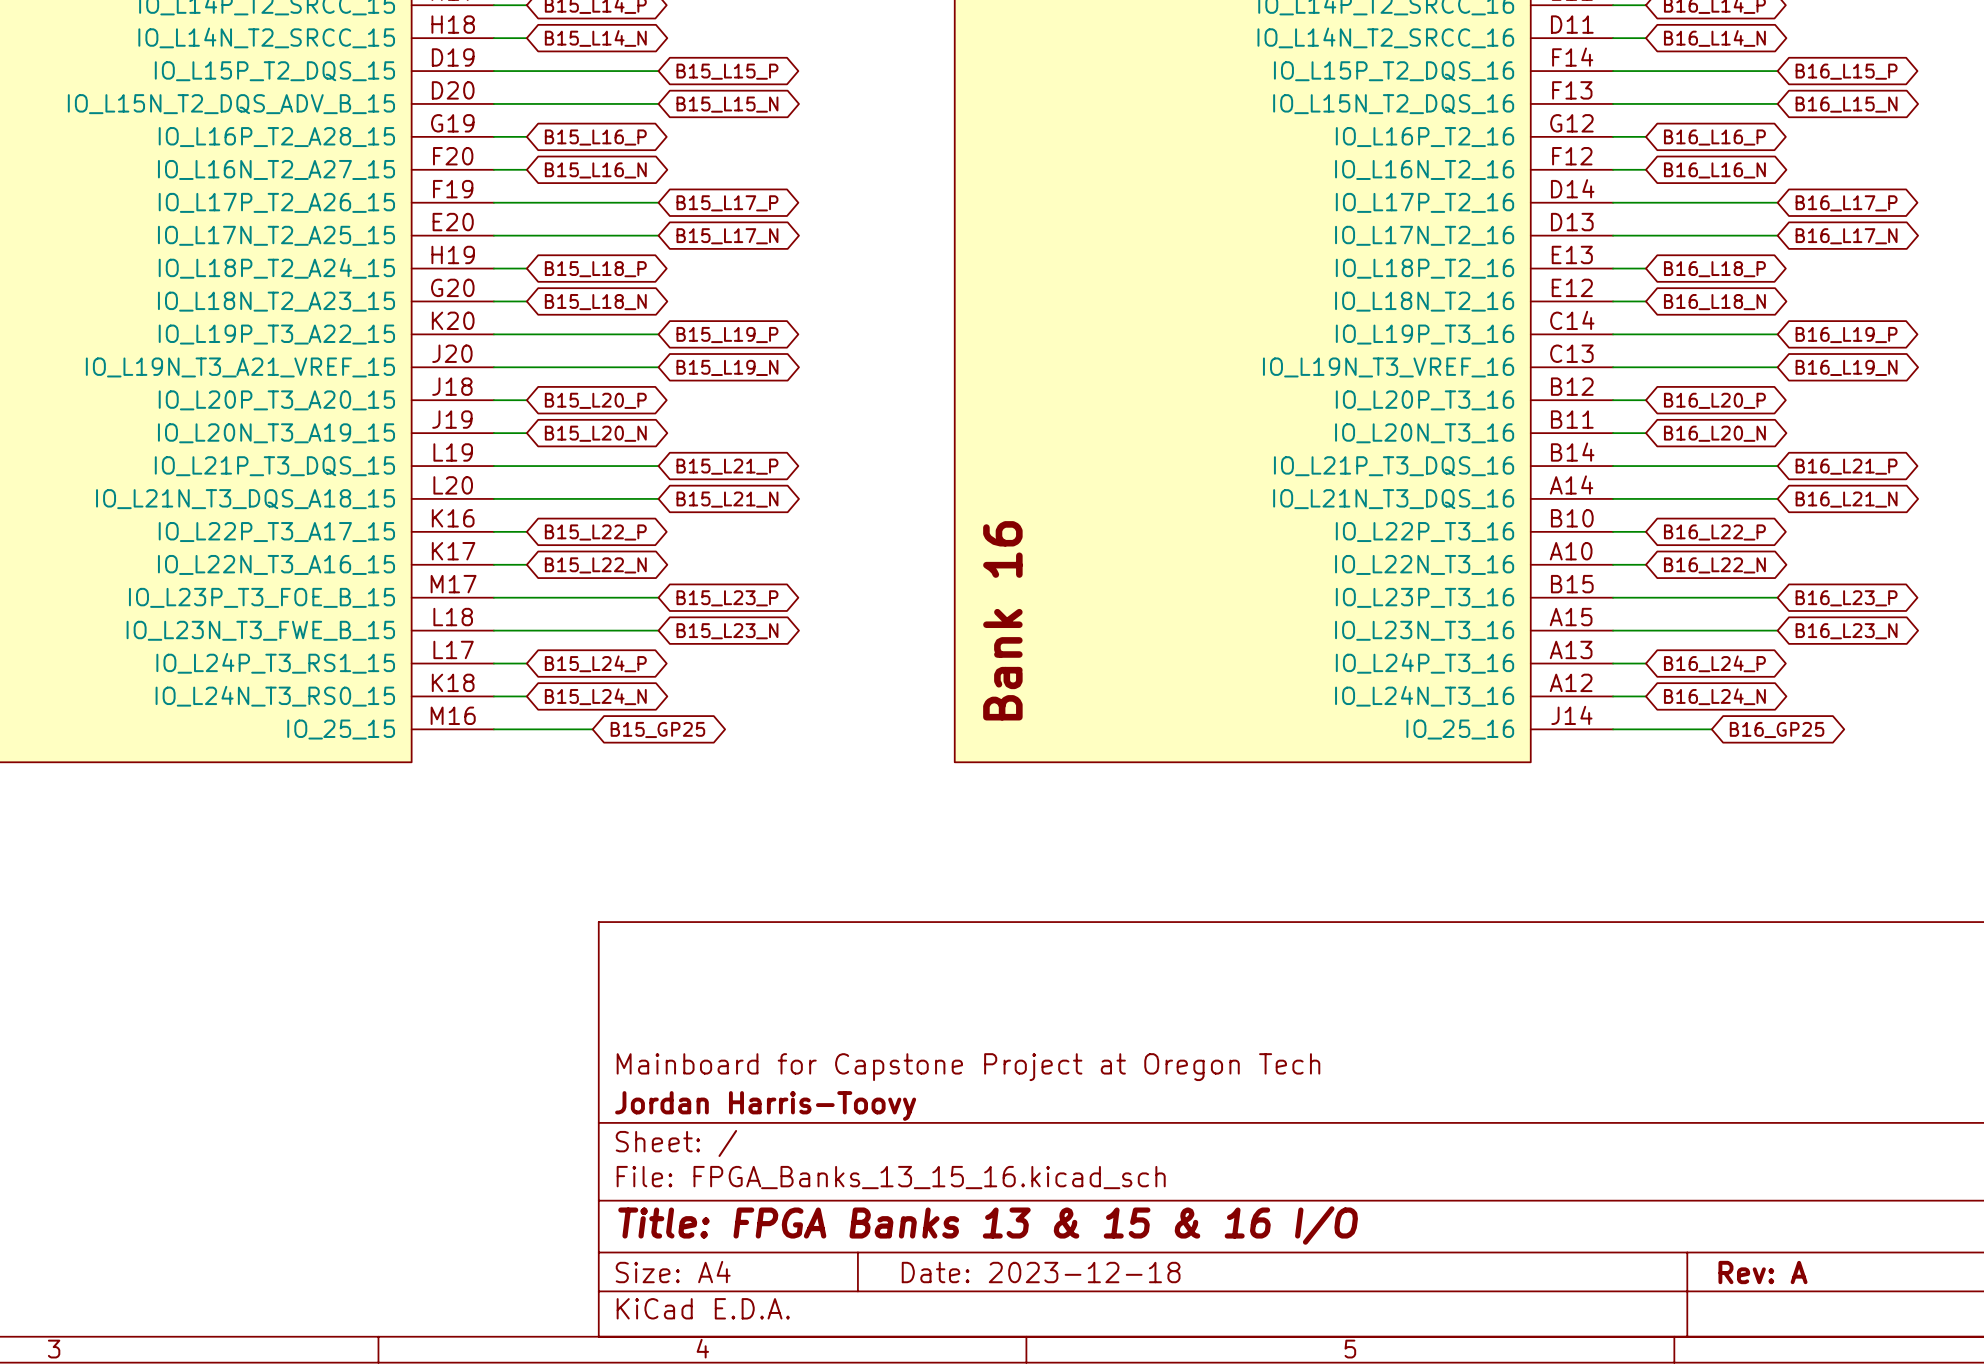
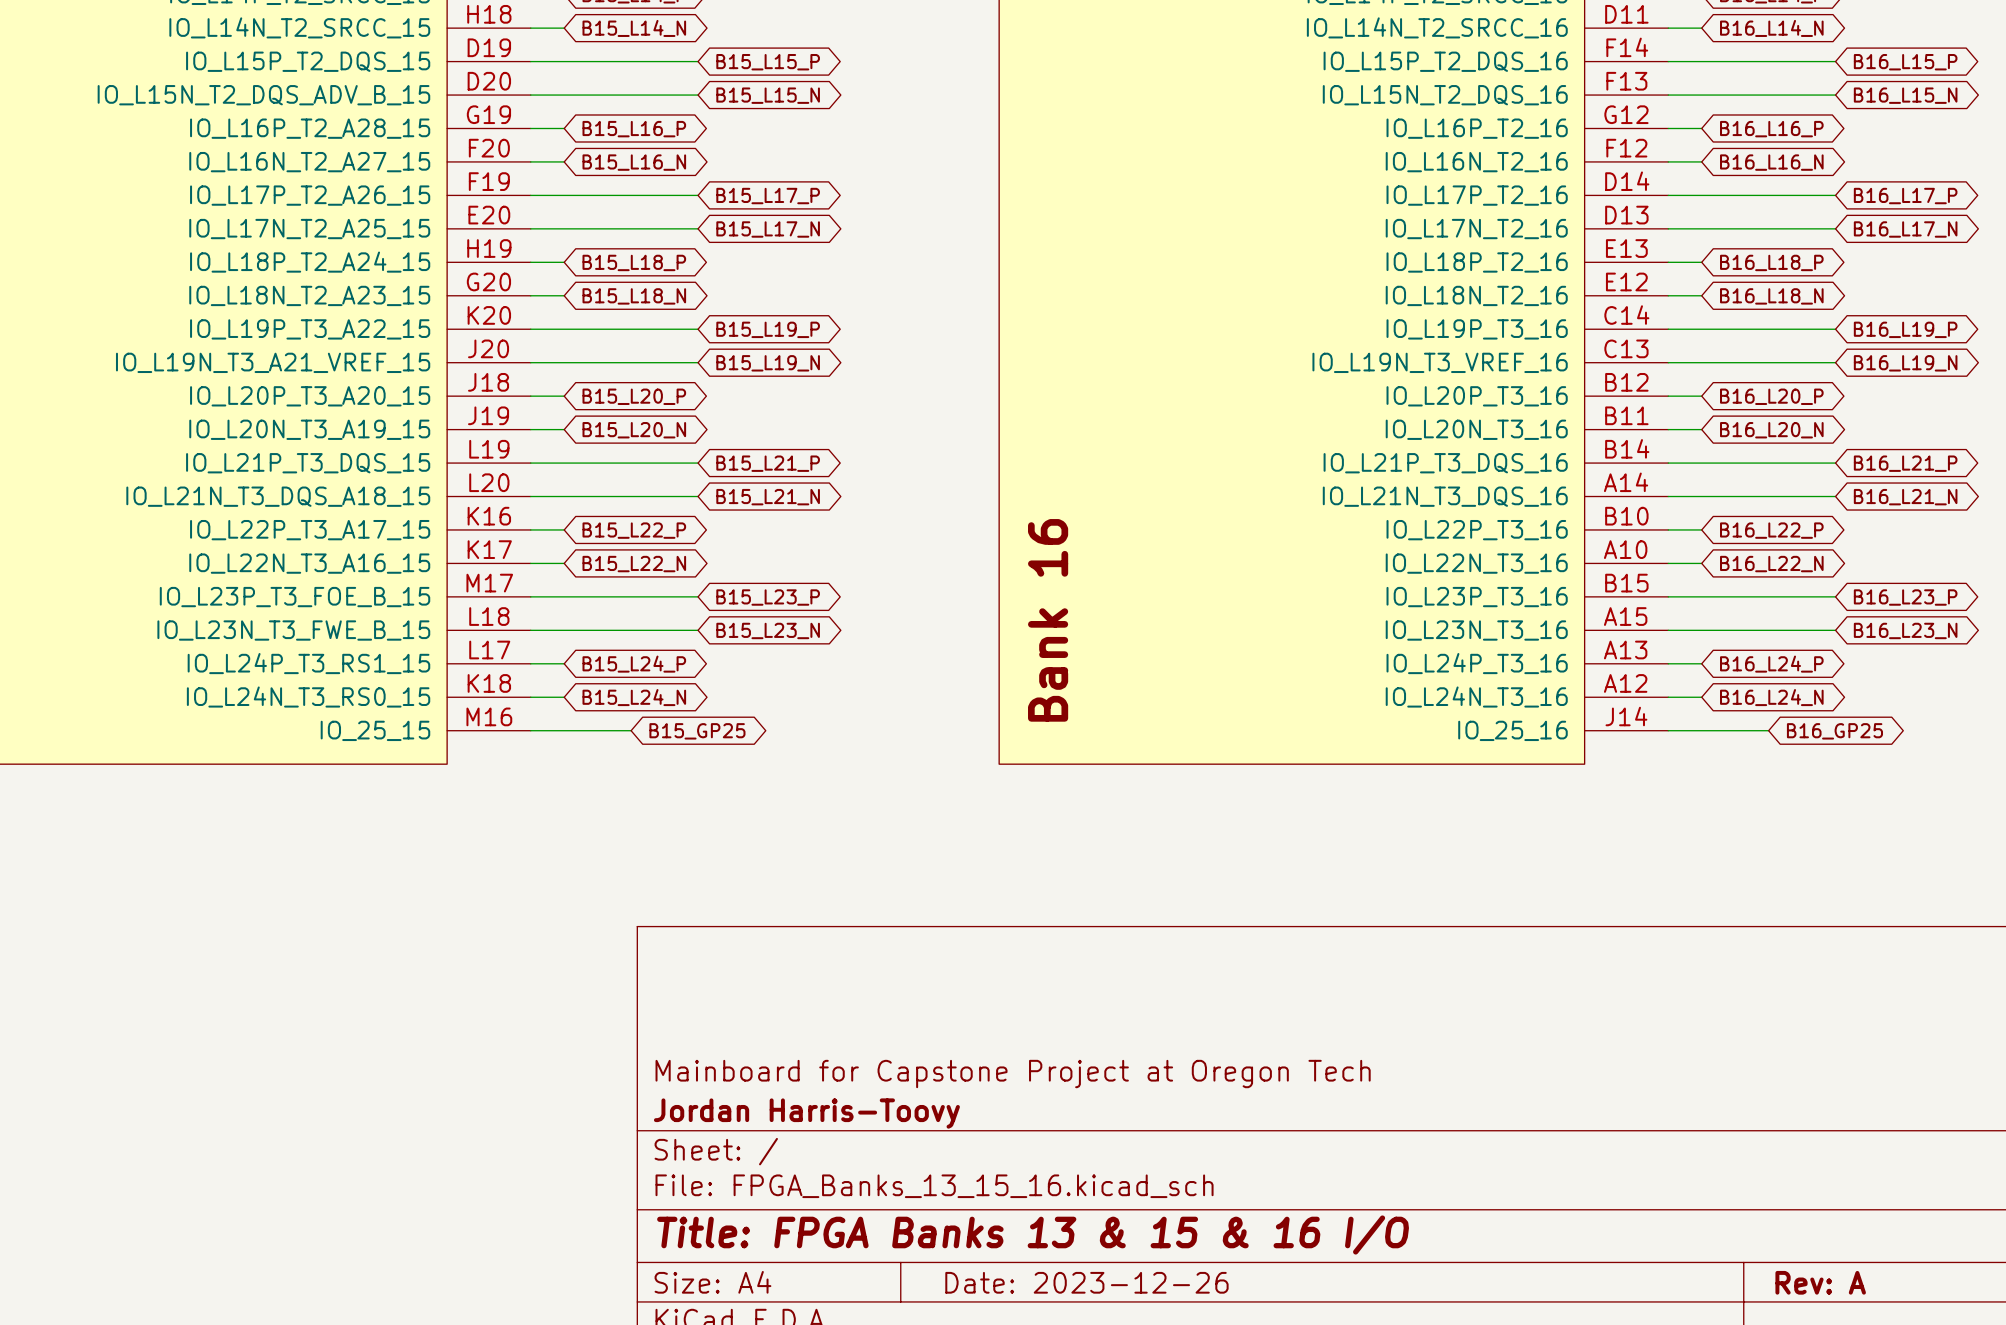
title block: Date: 2023-12-18 (1041, 1272) -> Date: 2023-12-26 (1086, 1282)

